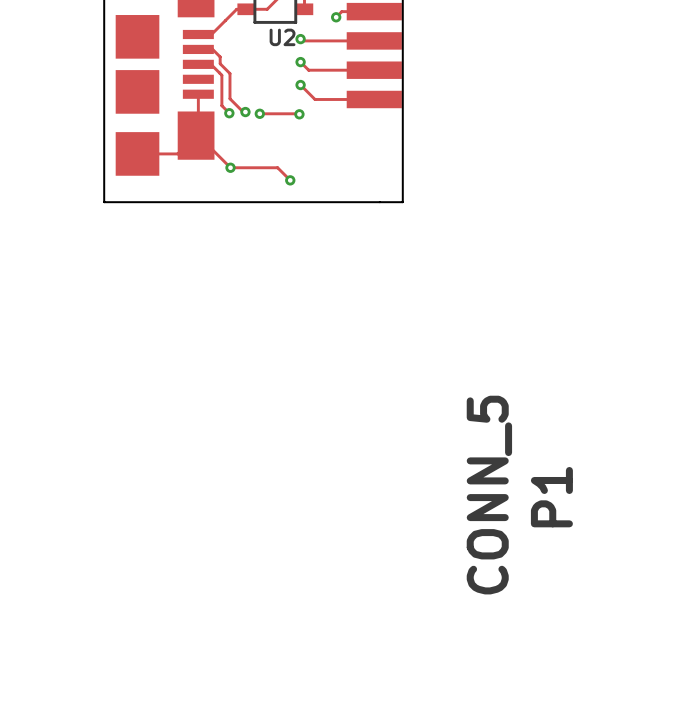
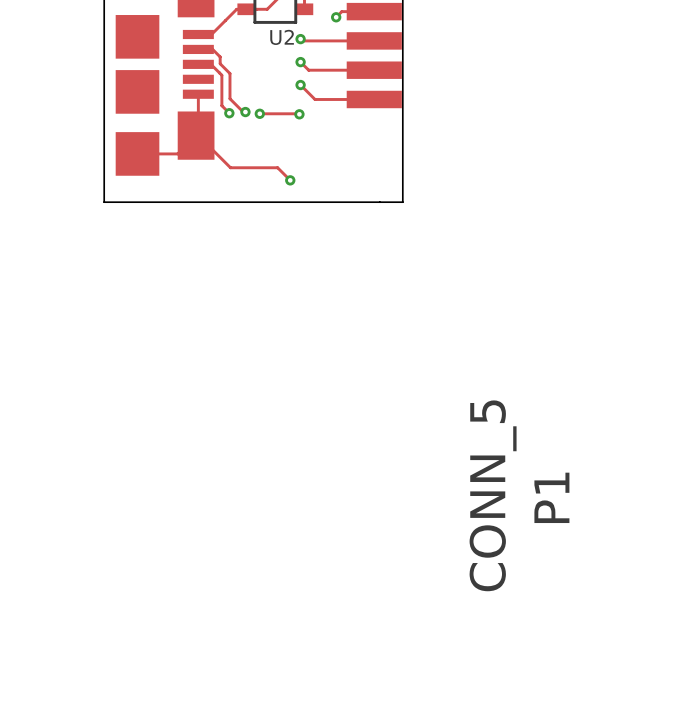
via: (230, 167) -> none

